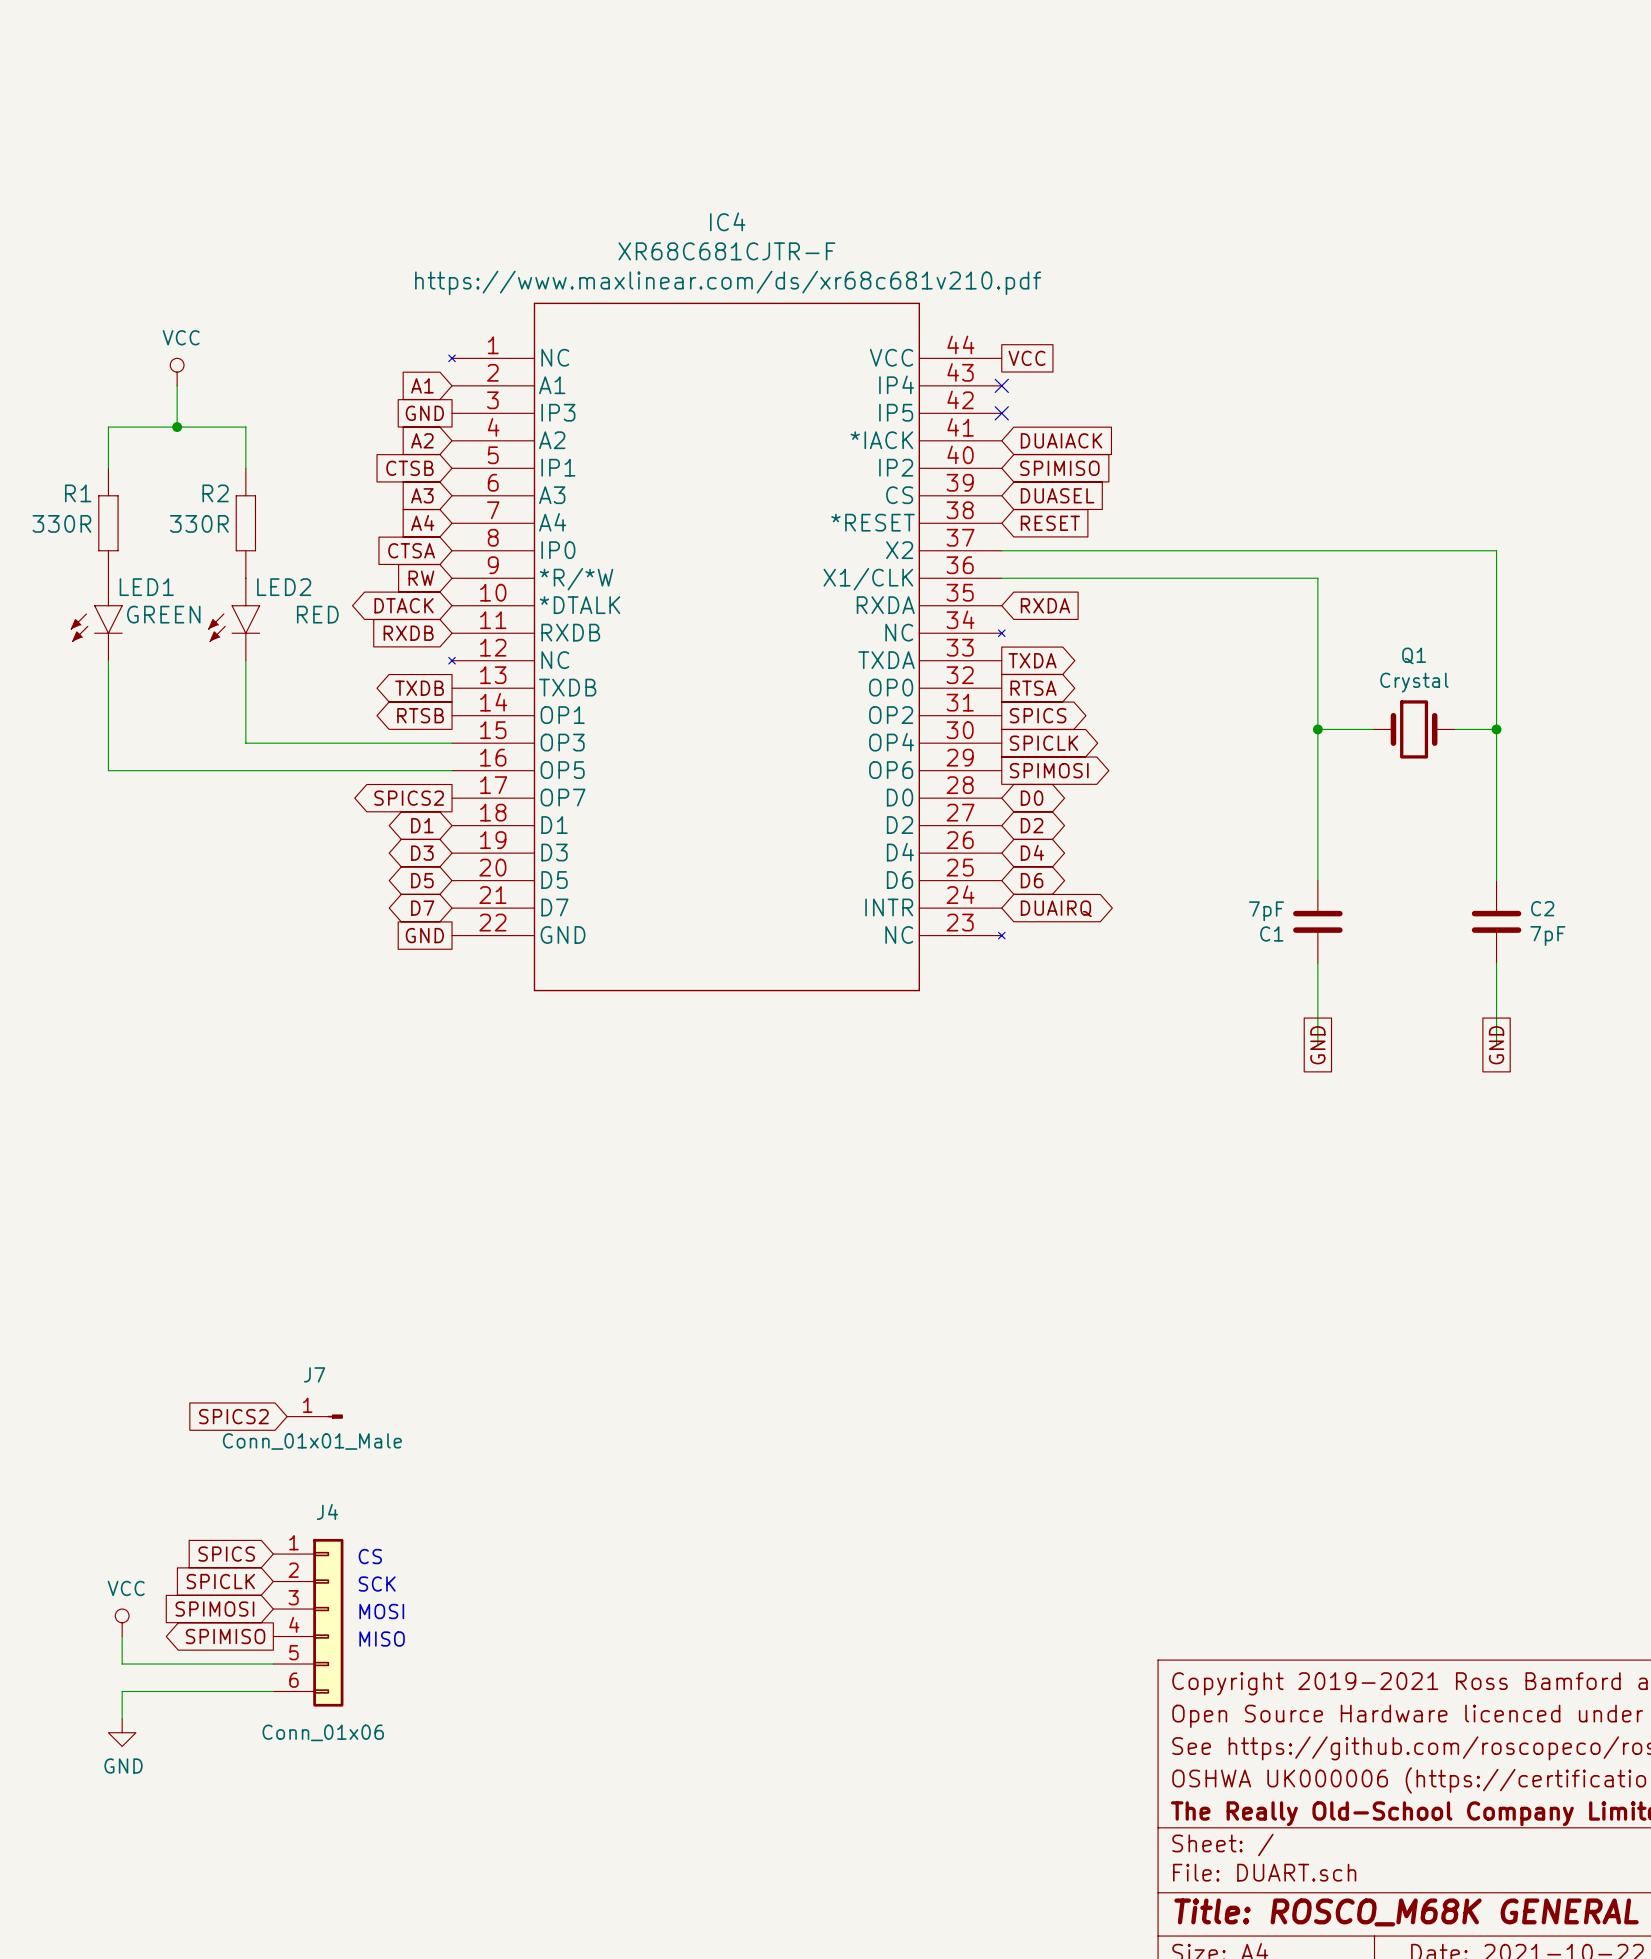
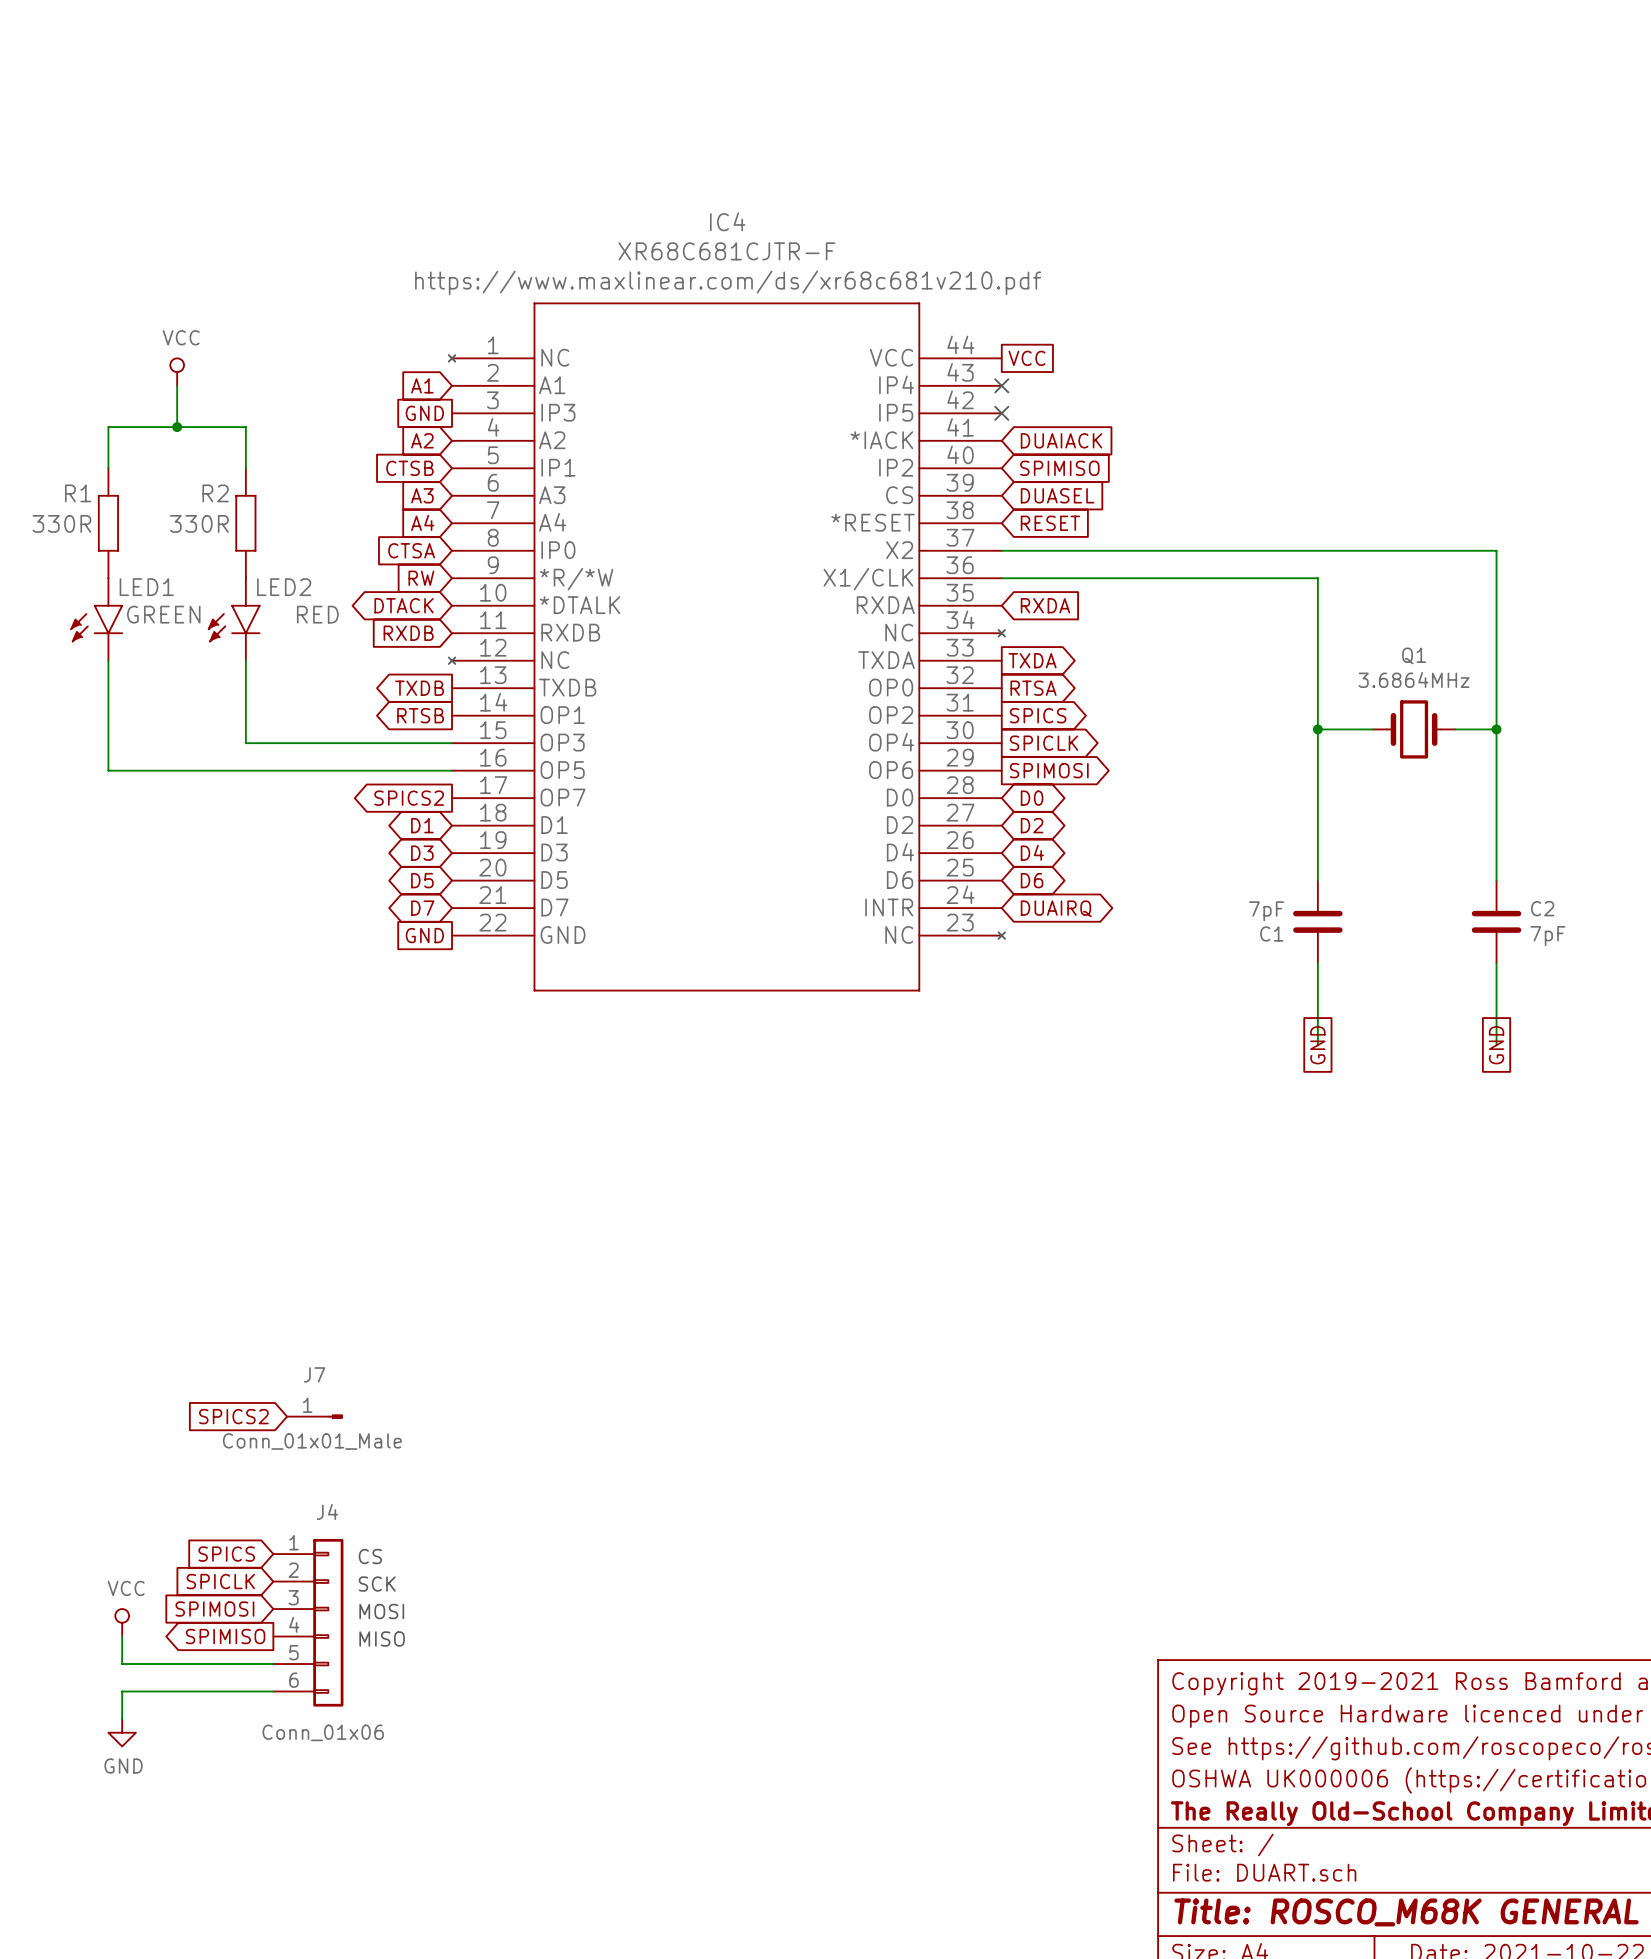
Q1 value: Crystal (1414, 682) -> 3.6864MHz (1414, 679)

